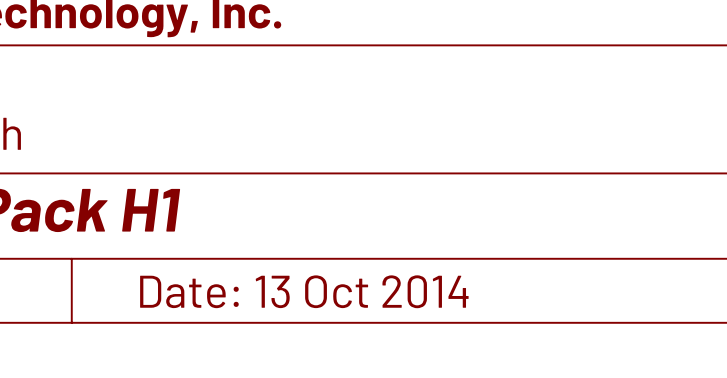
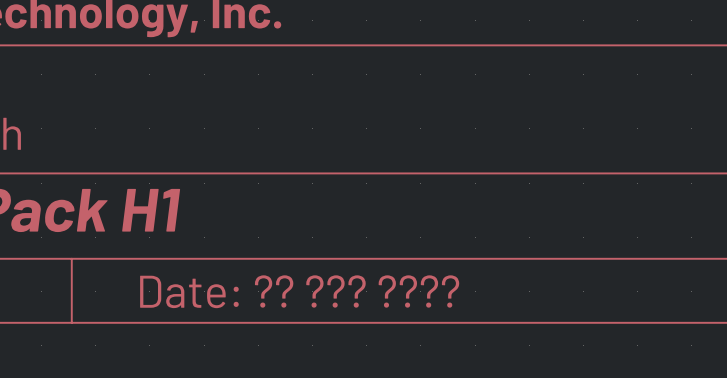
title block: Date: 13 Oct 2014 (304, 291) -> Date: ?? ??? ???? (299, 291)

